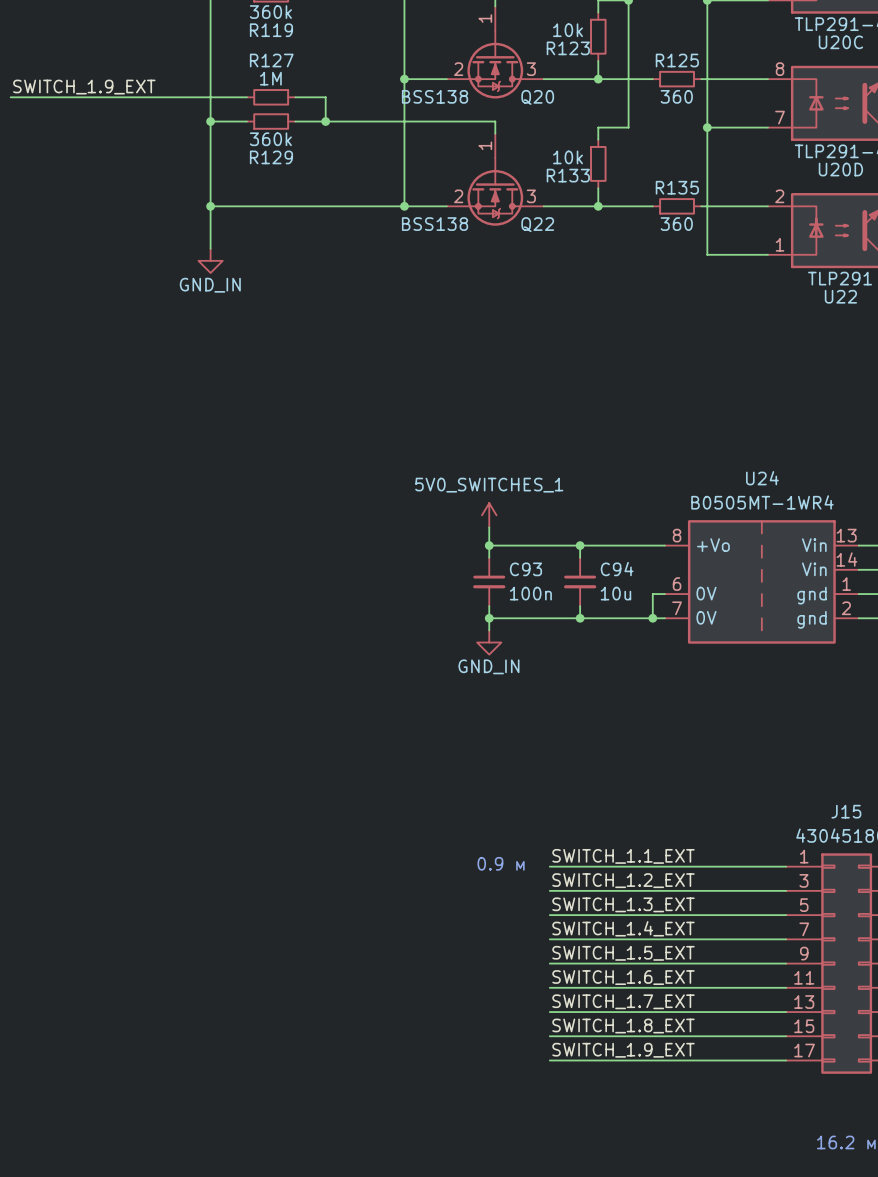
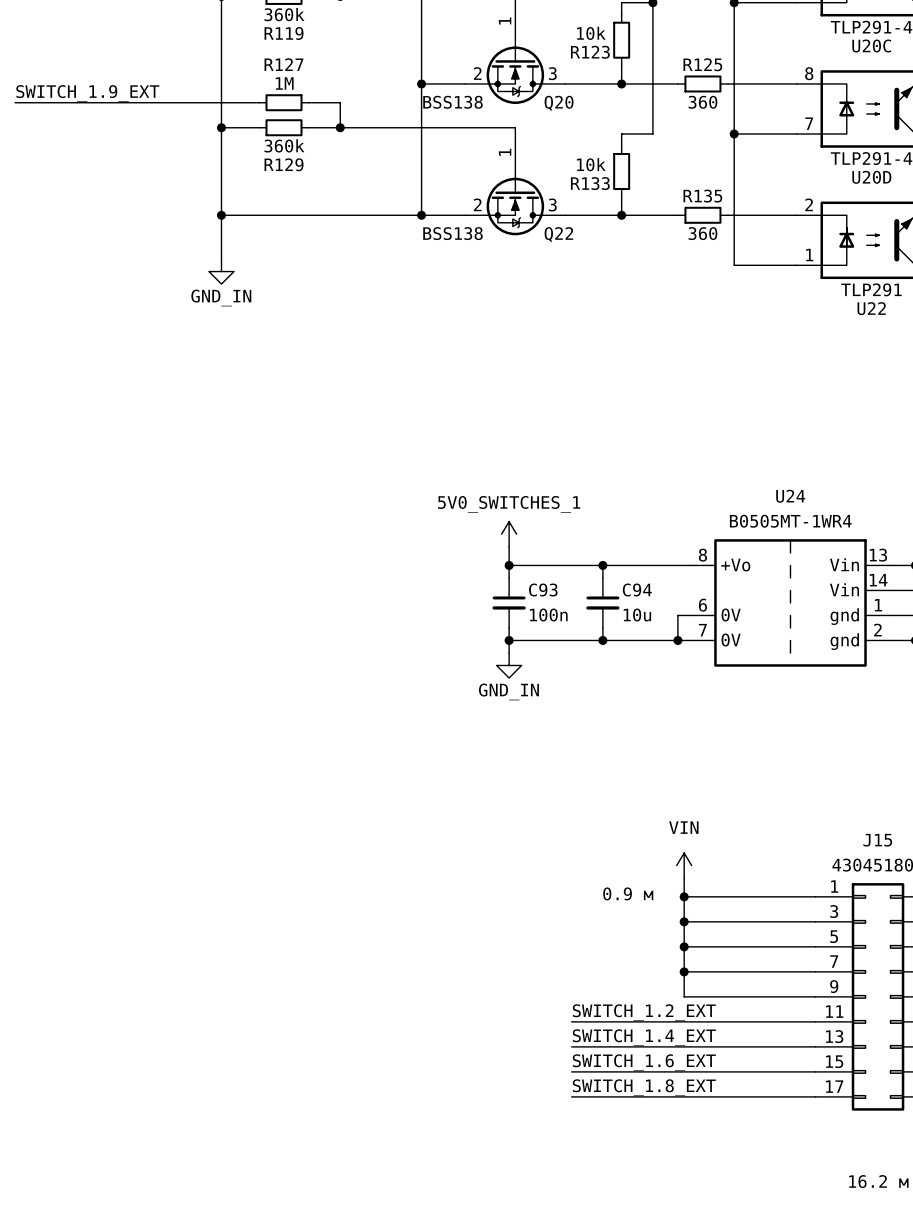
power symbol: none -> VIN (684, 865)
label: SWITCH_1.1_EXT (623, 856) -> none
text position: 0.9 м (501, 863) -> 0.9 м (628, 893)
wire: (549, 866) (658, 866) -> none
junction: none -> (684, 896)
label: SWITCH_1.2_EXT (623, 880) -> none
wire: (549, 890) (658, 890) -> none
junction: none -> (684, 921)
label: SWITCH_1.3_EXT (623, 904) -> none
wire: (549, 915) (658, 915) -> none
junction: none -> (684, 946)
label: SWITCH_1.4_EXT (623, 928) -> none
wire: (549, 939) (658, 939) -> none
junction: none -> (684, 971)
label: SWITCH_1.5_EXT (623, 953) -> none
wire: (549, 963) (658, 963) -> (684, 878) (684, 996)
label: SWITCH_1.6_EXT (623, 977) -> SWITCH_1.2_EXT (644, 1012)
label: SWITCH_1.7_EXT (623, 1001) -> SWITCH_1.4_EXT (644, 1037)
label: SWITCH_1.8_EXT (623, 1026) -> SWITCH_1.6_EXT (644, 1062)
label: SWITCH_1.9_EXT (623, 1050) -> SWITCH_1.8_EXT (644, 1087)

